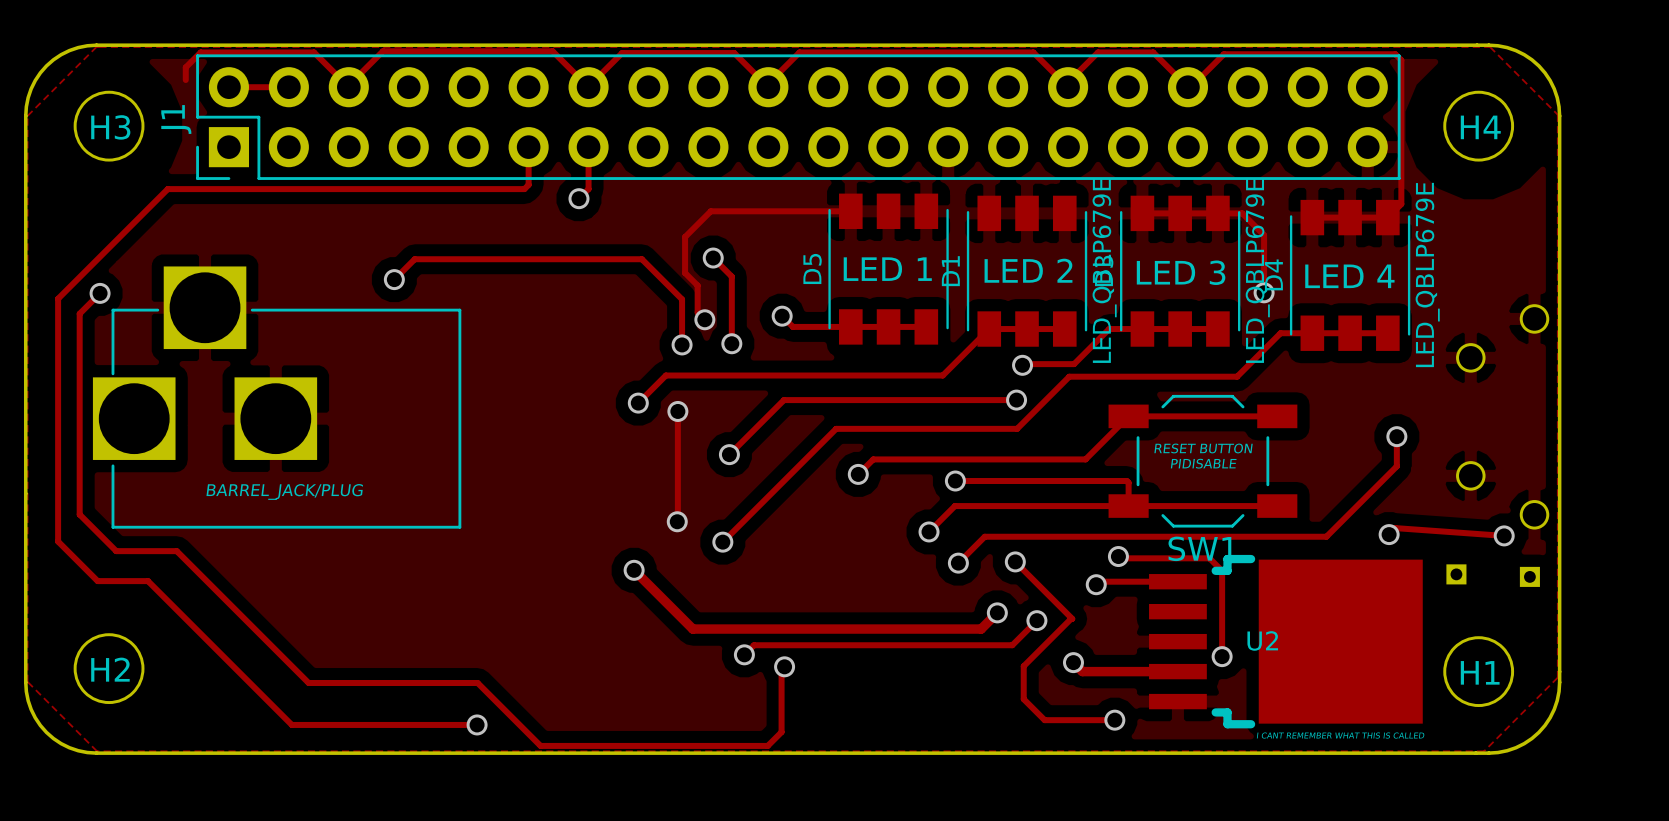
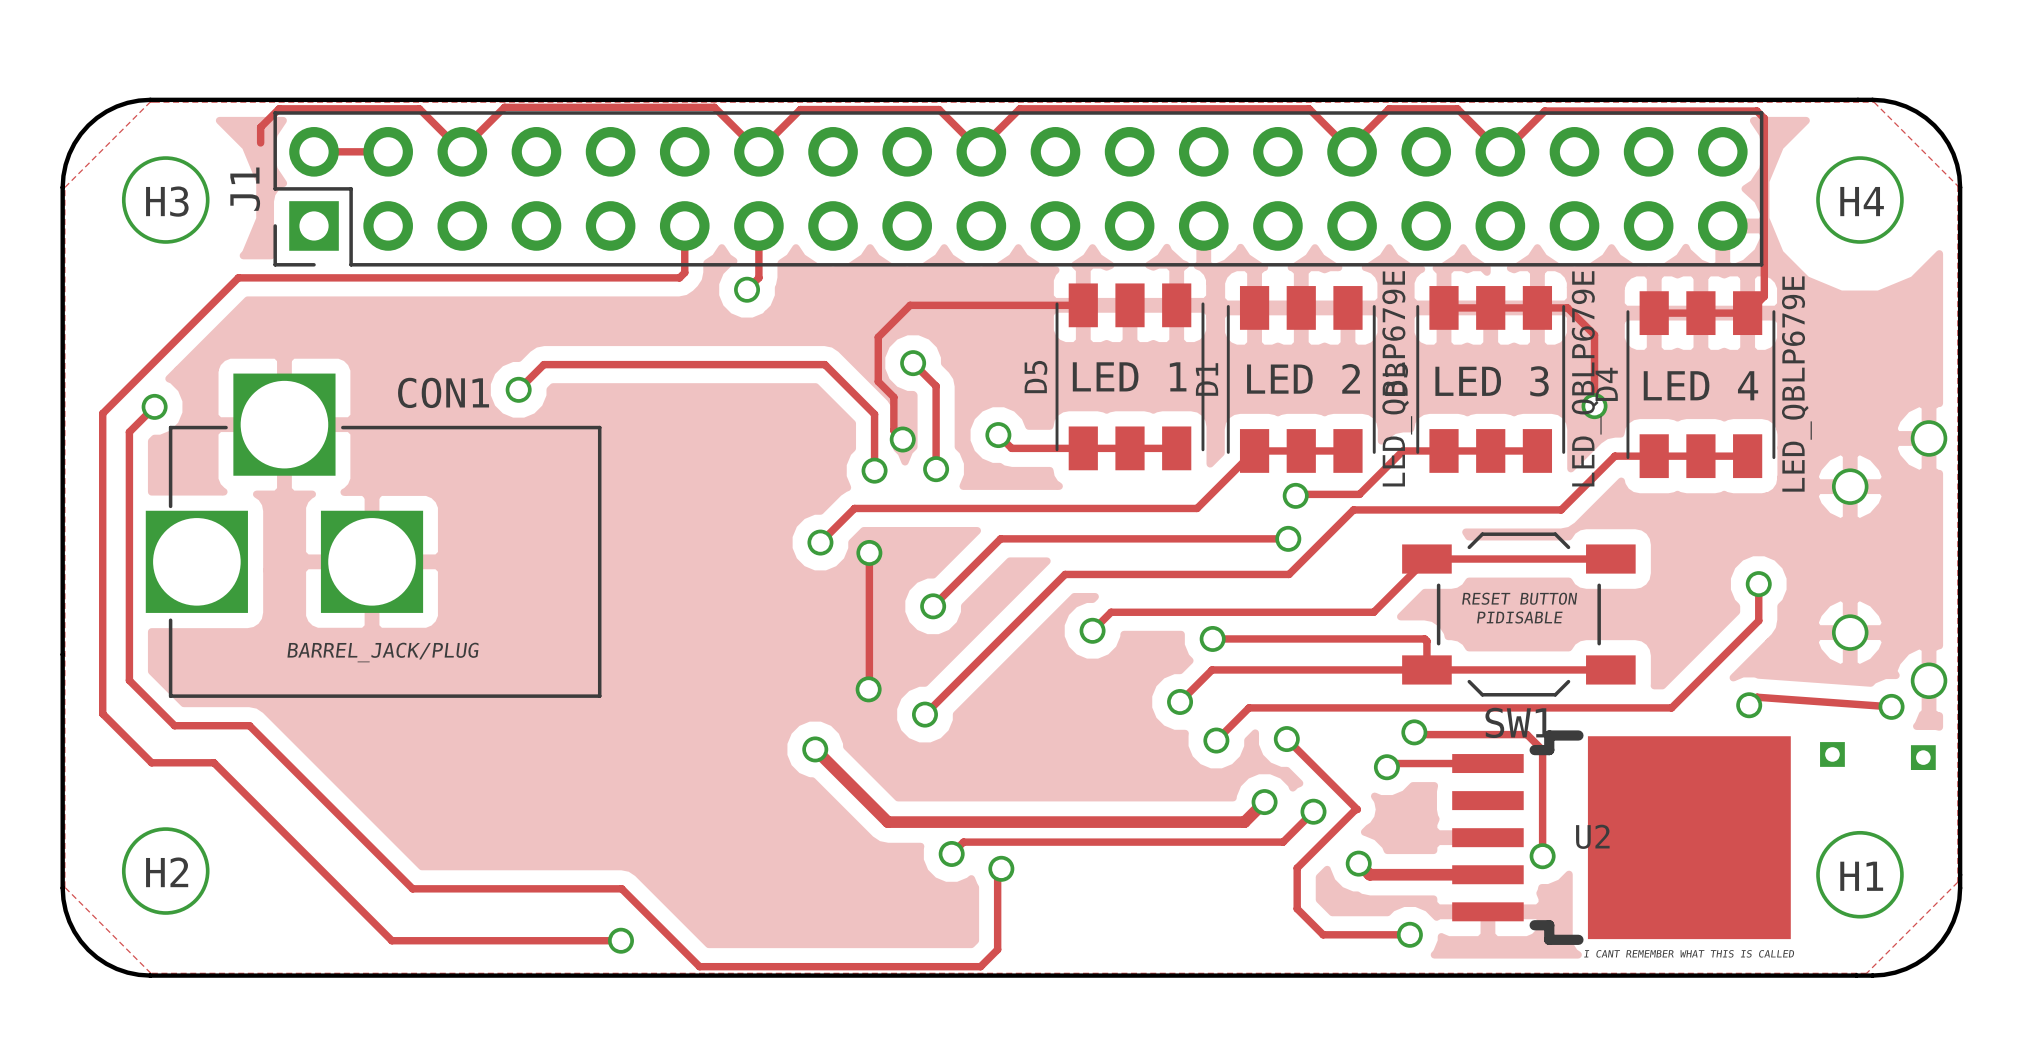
CON1 name: none -> CON1 (443, 392)

